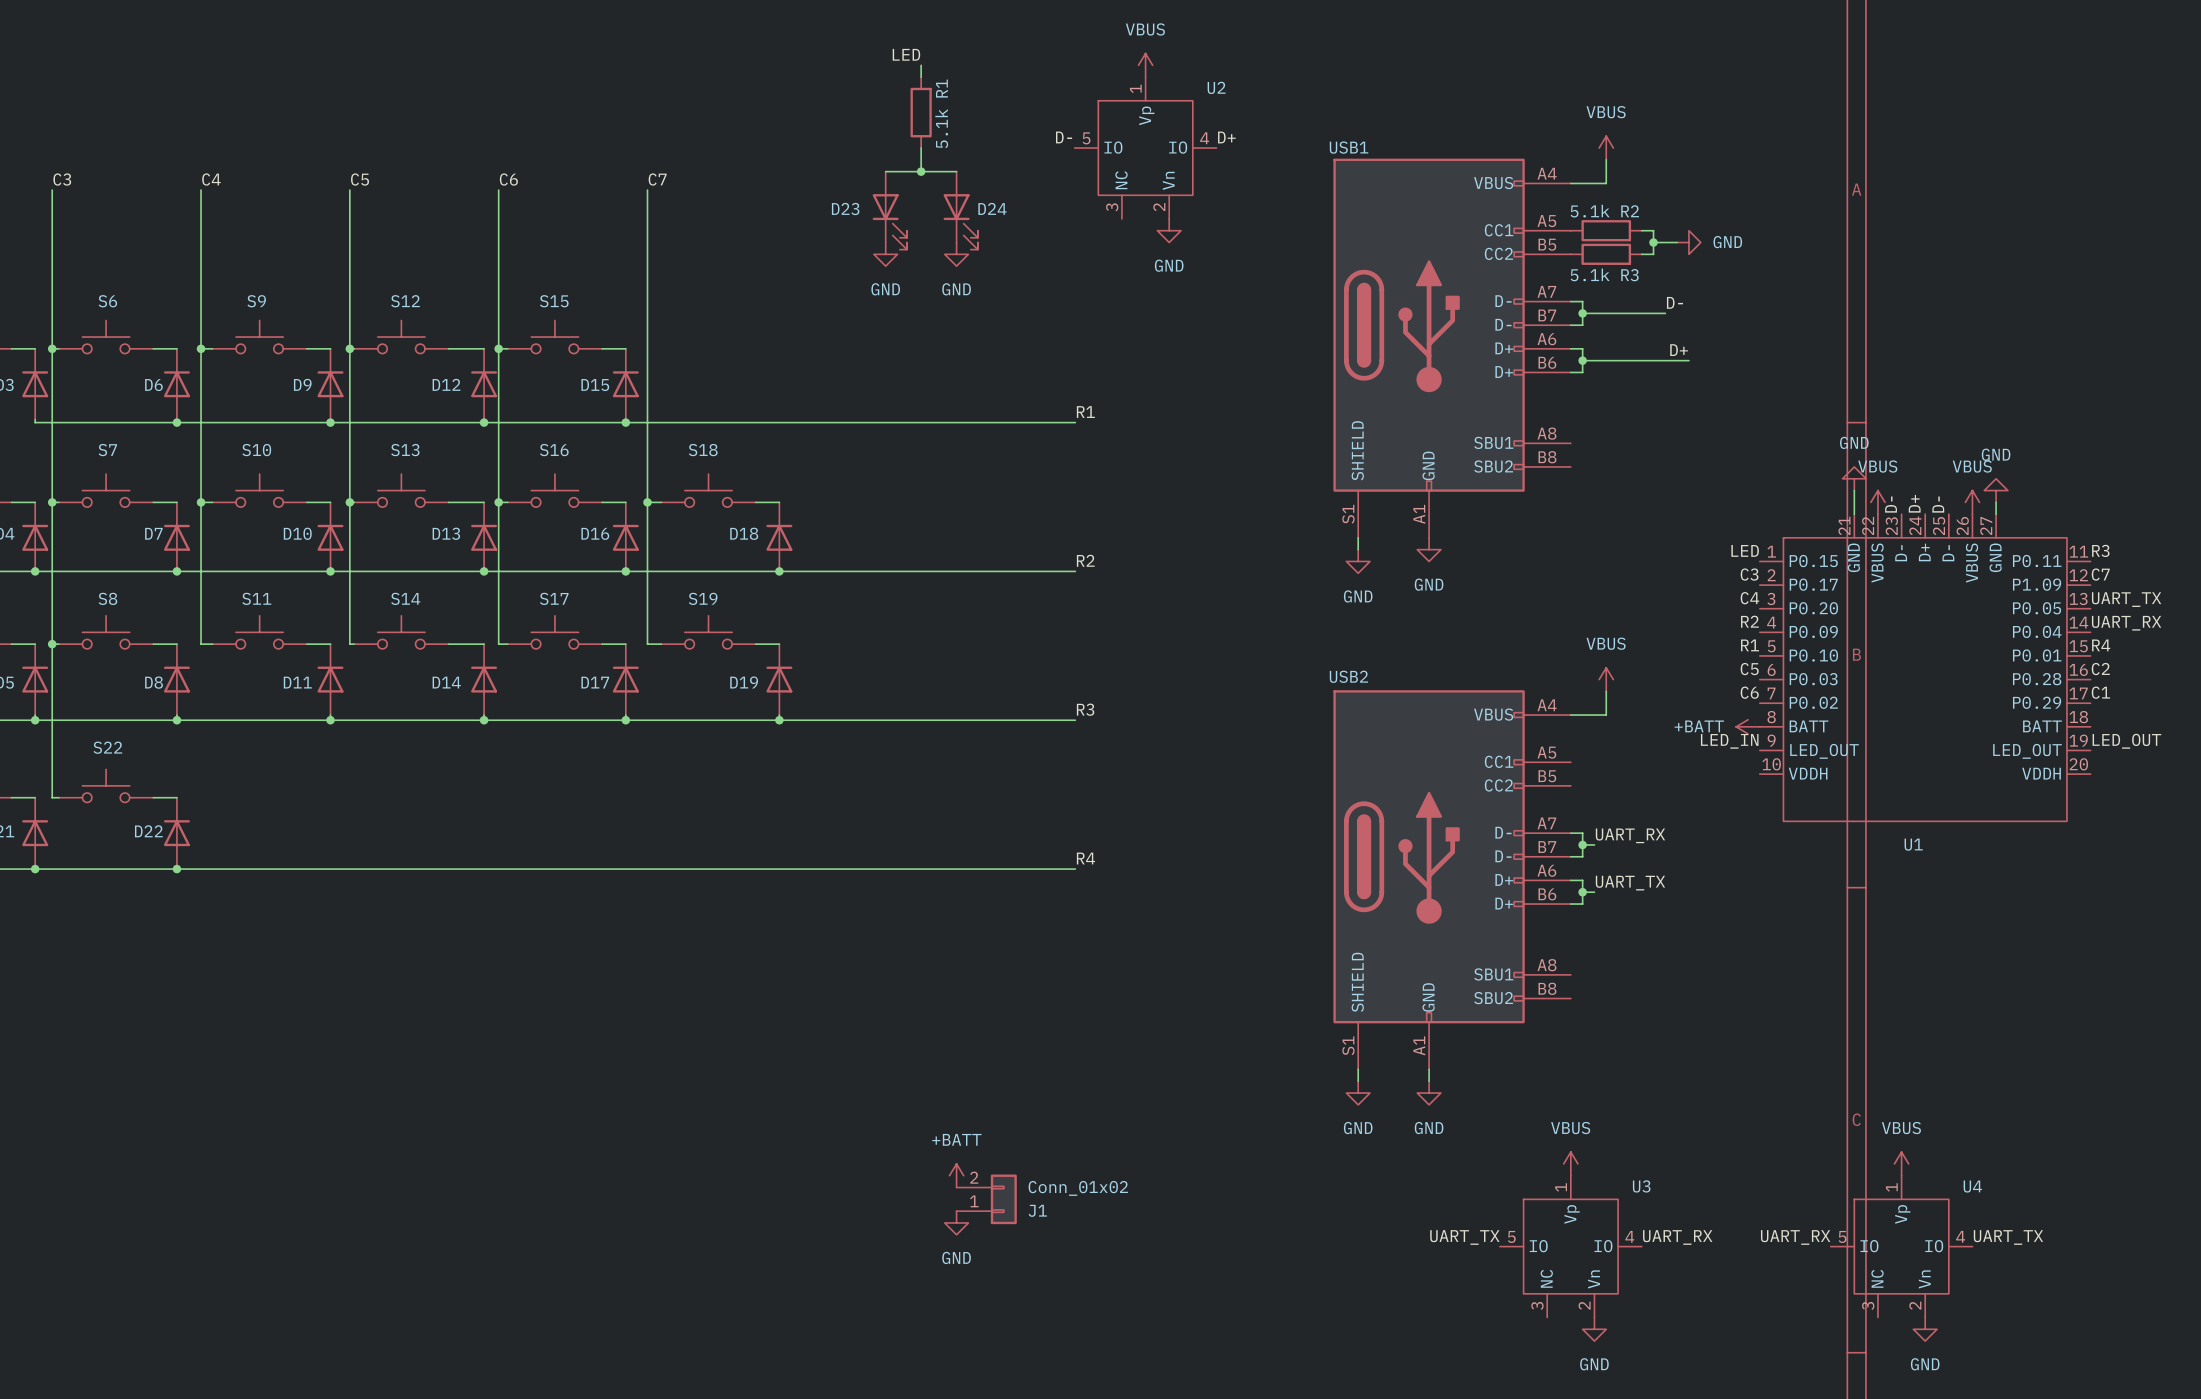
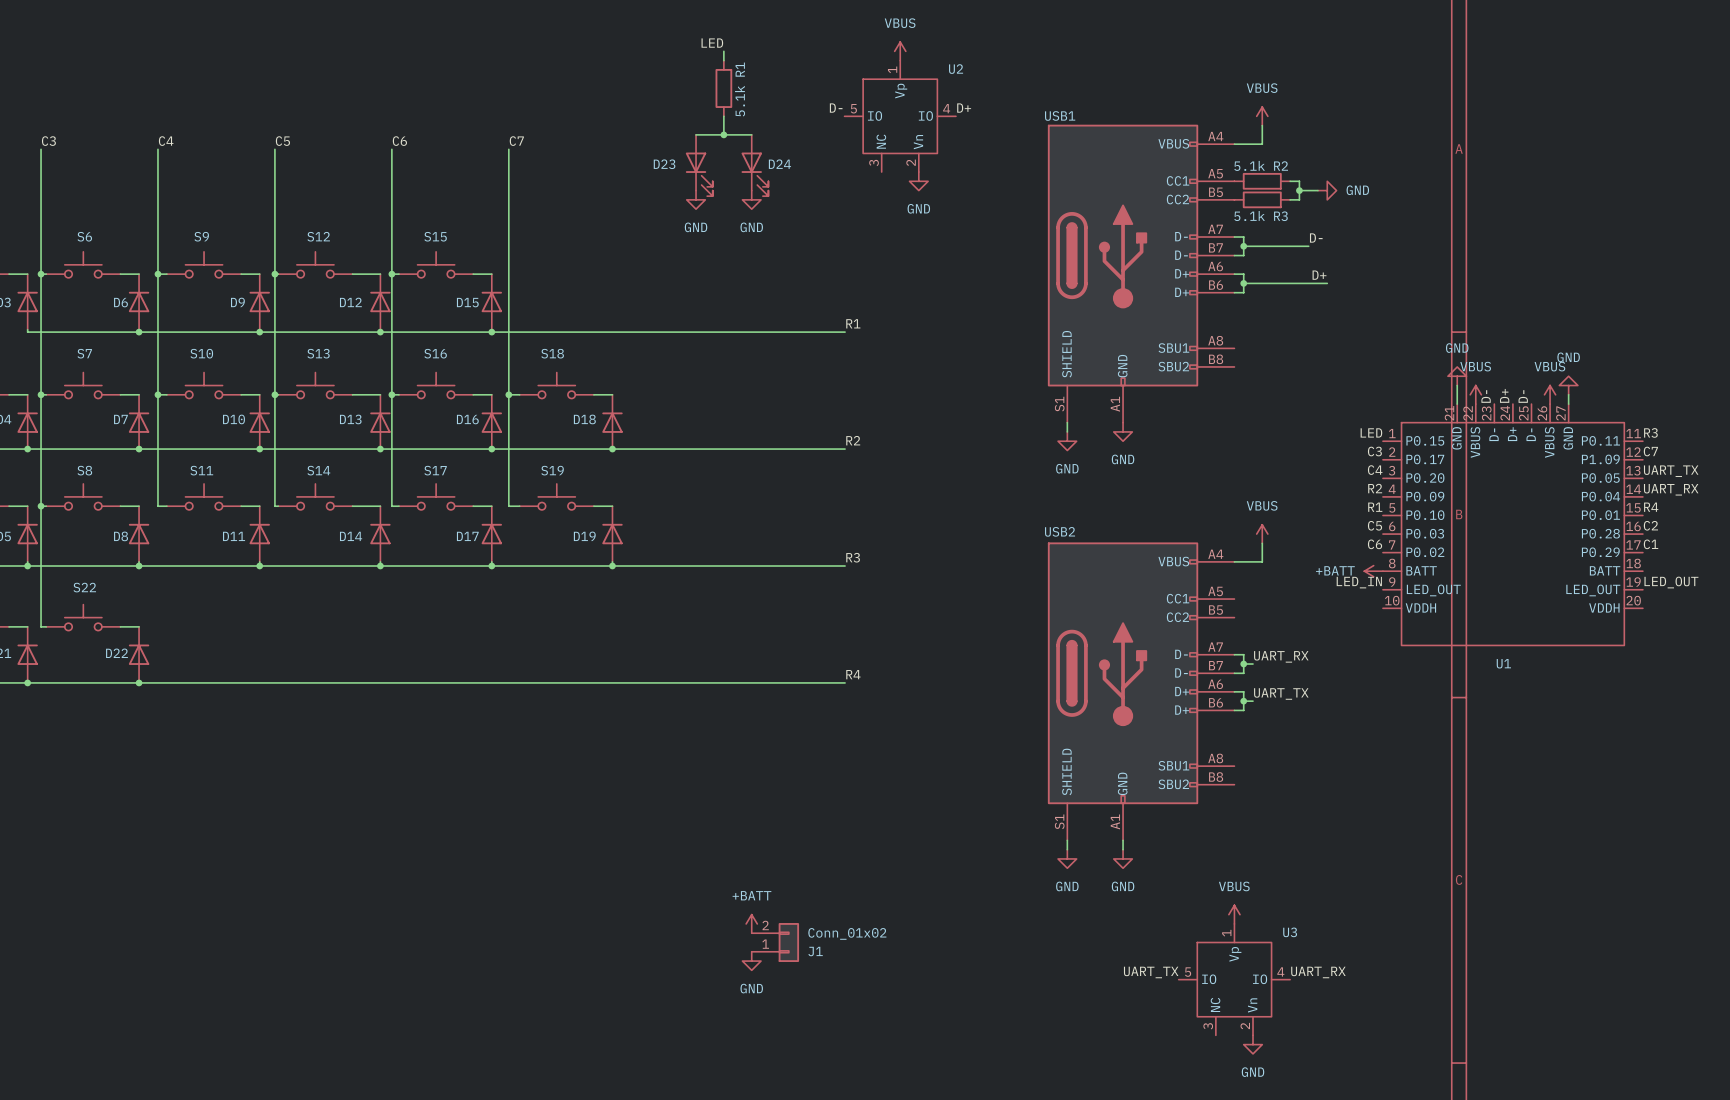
power symbol: VBUS (1901, 1163) -> none
label: UART_RX (1795, 1237) -> none
label: UART_TX (2008, 1237) -> none
U4: (1901, 1246) -> none
power symbol: GND (1925, 1329) -> none

